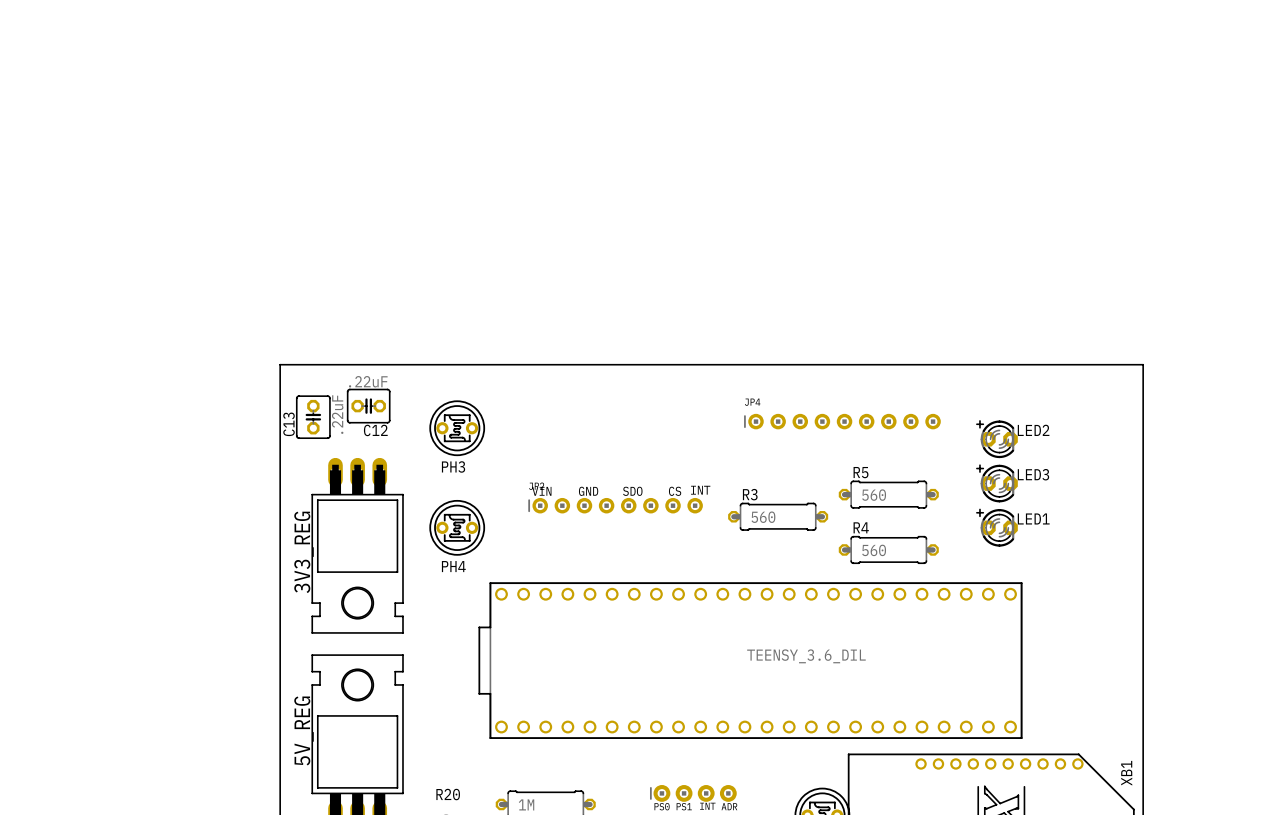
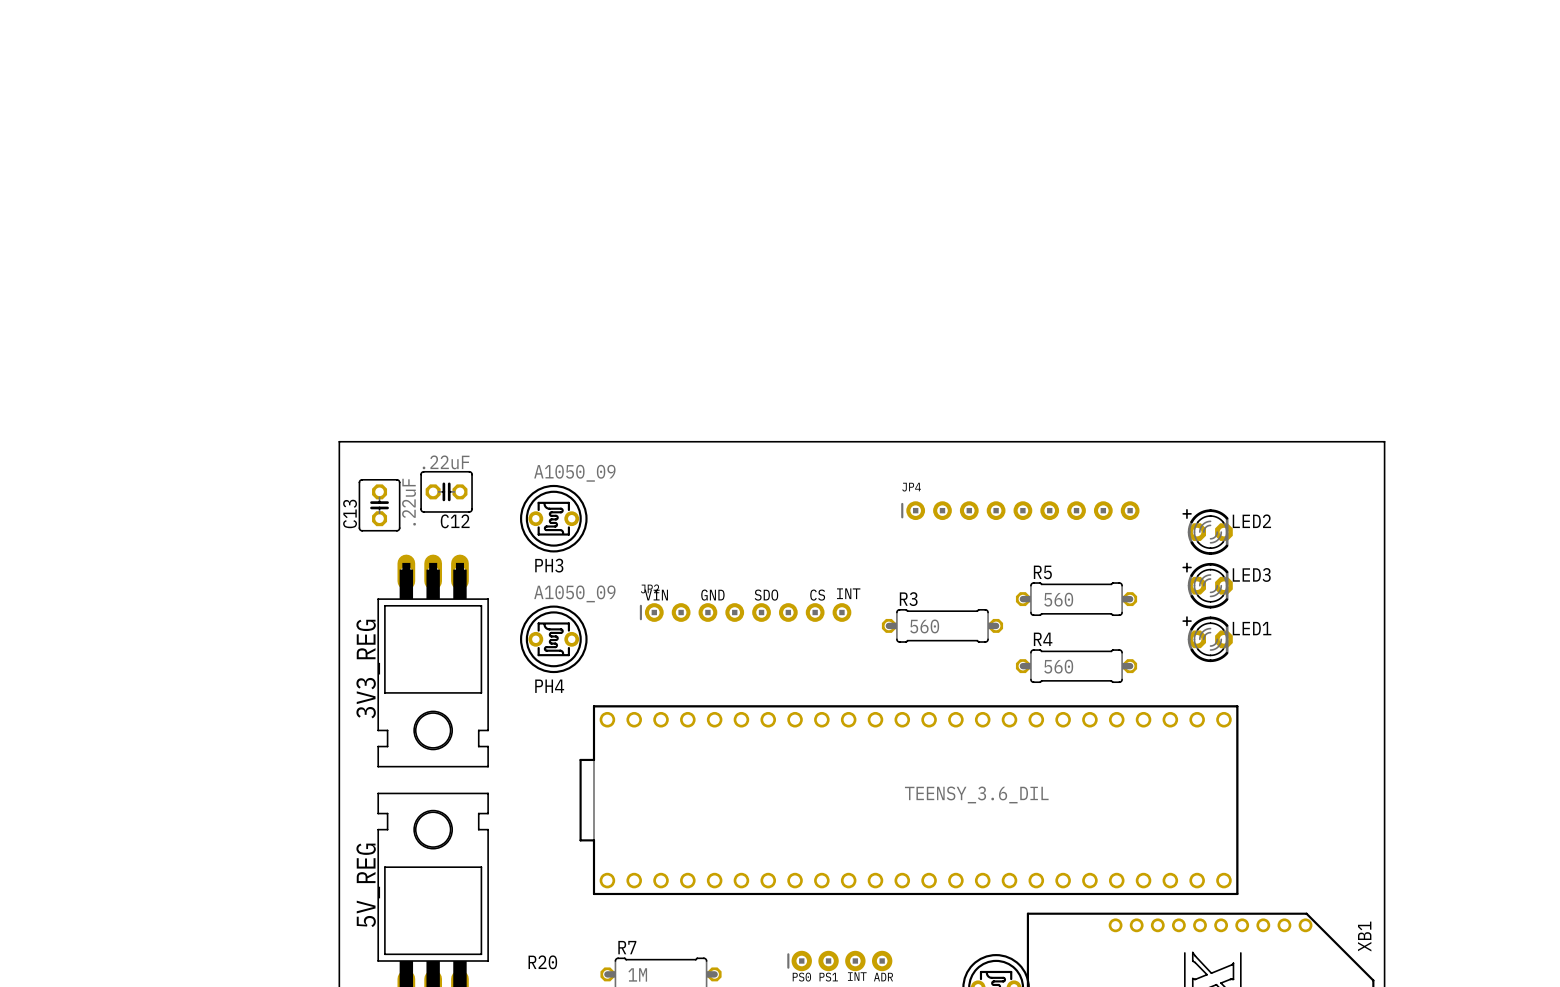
PH3 value: none -> A1050_09 (574, 473)
PH4 value: none -> A1050_09 (574, 593)
R7 name: none -> R7 (627, 947)

